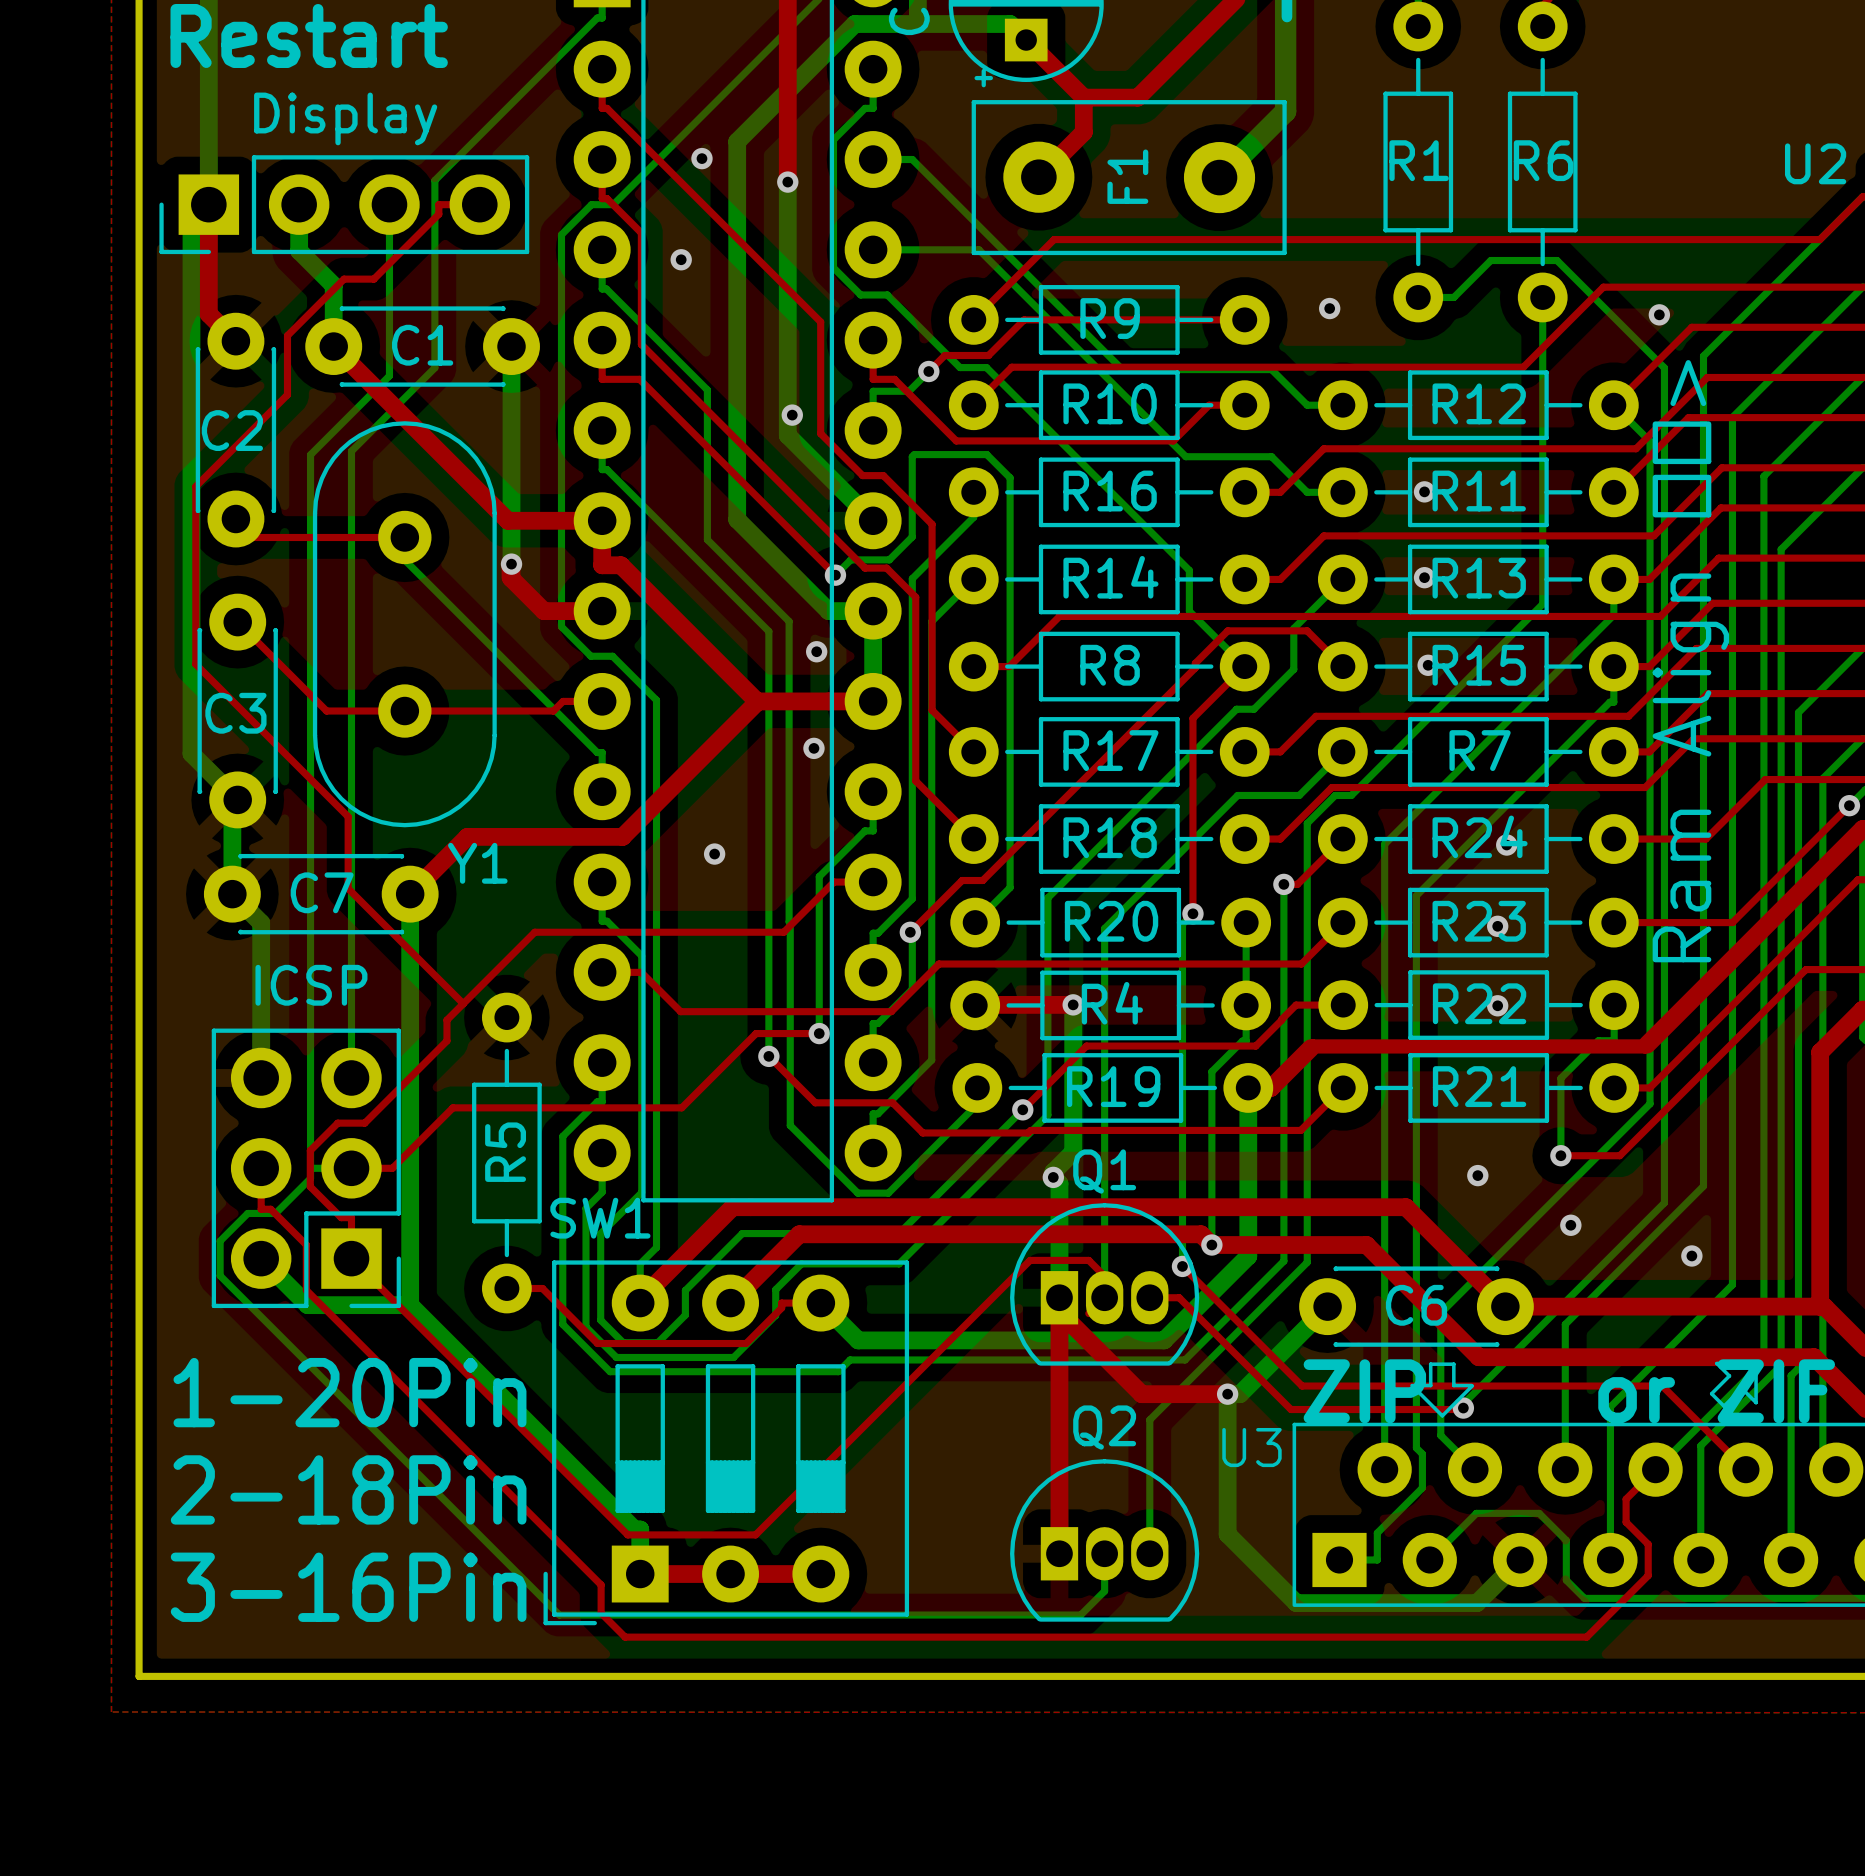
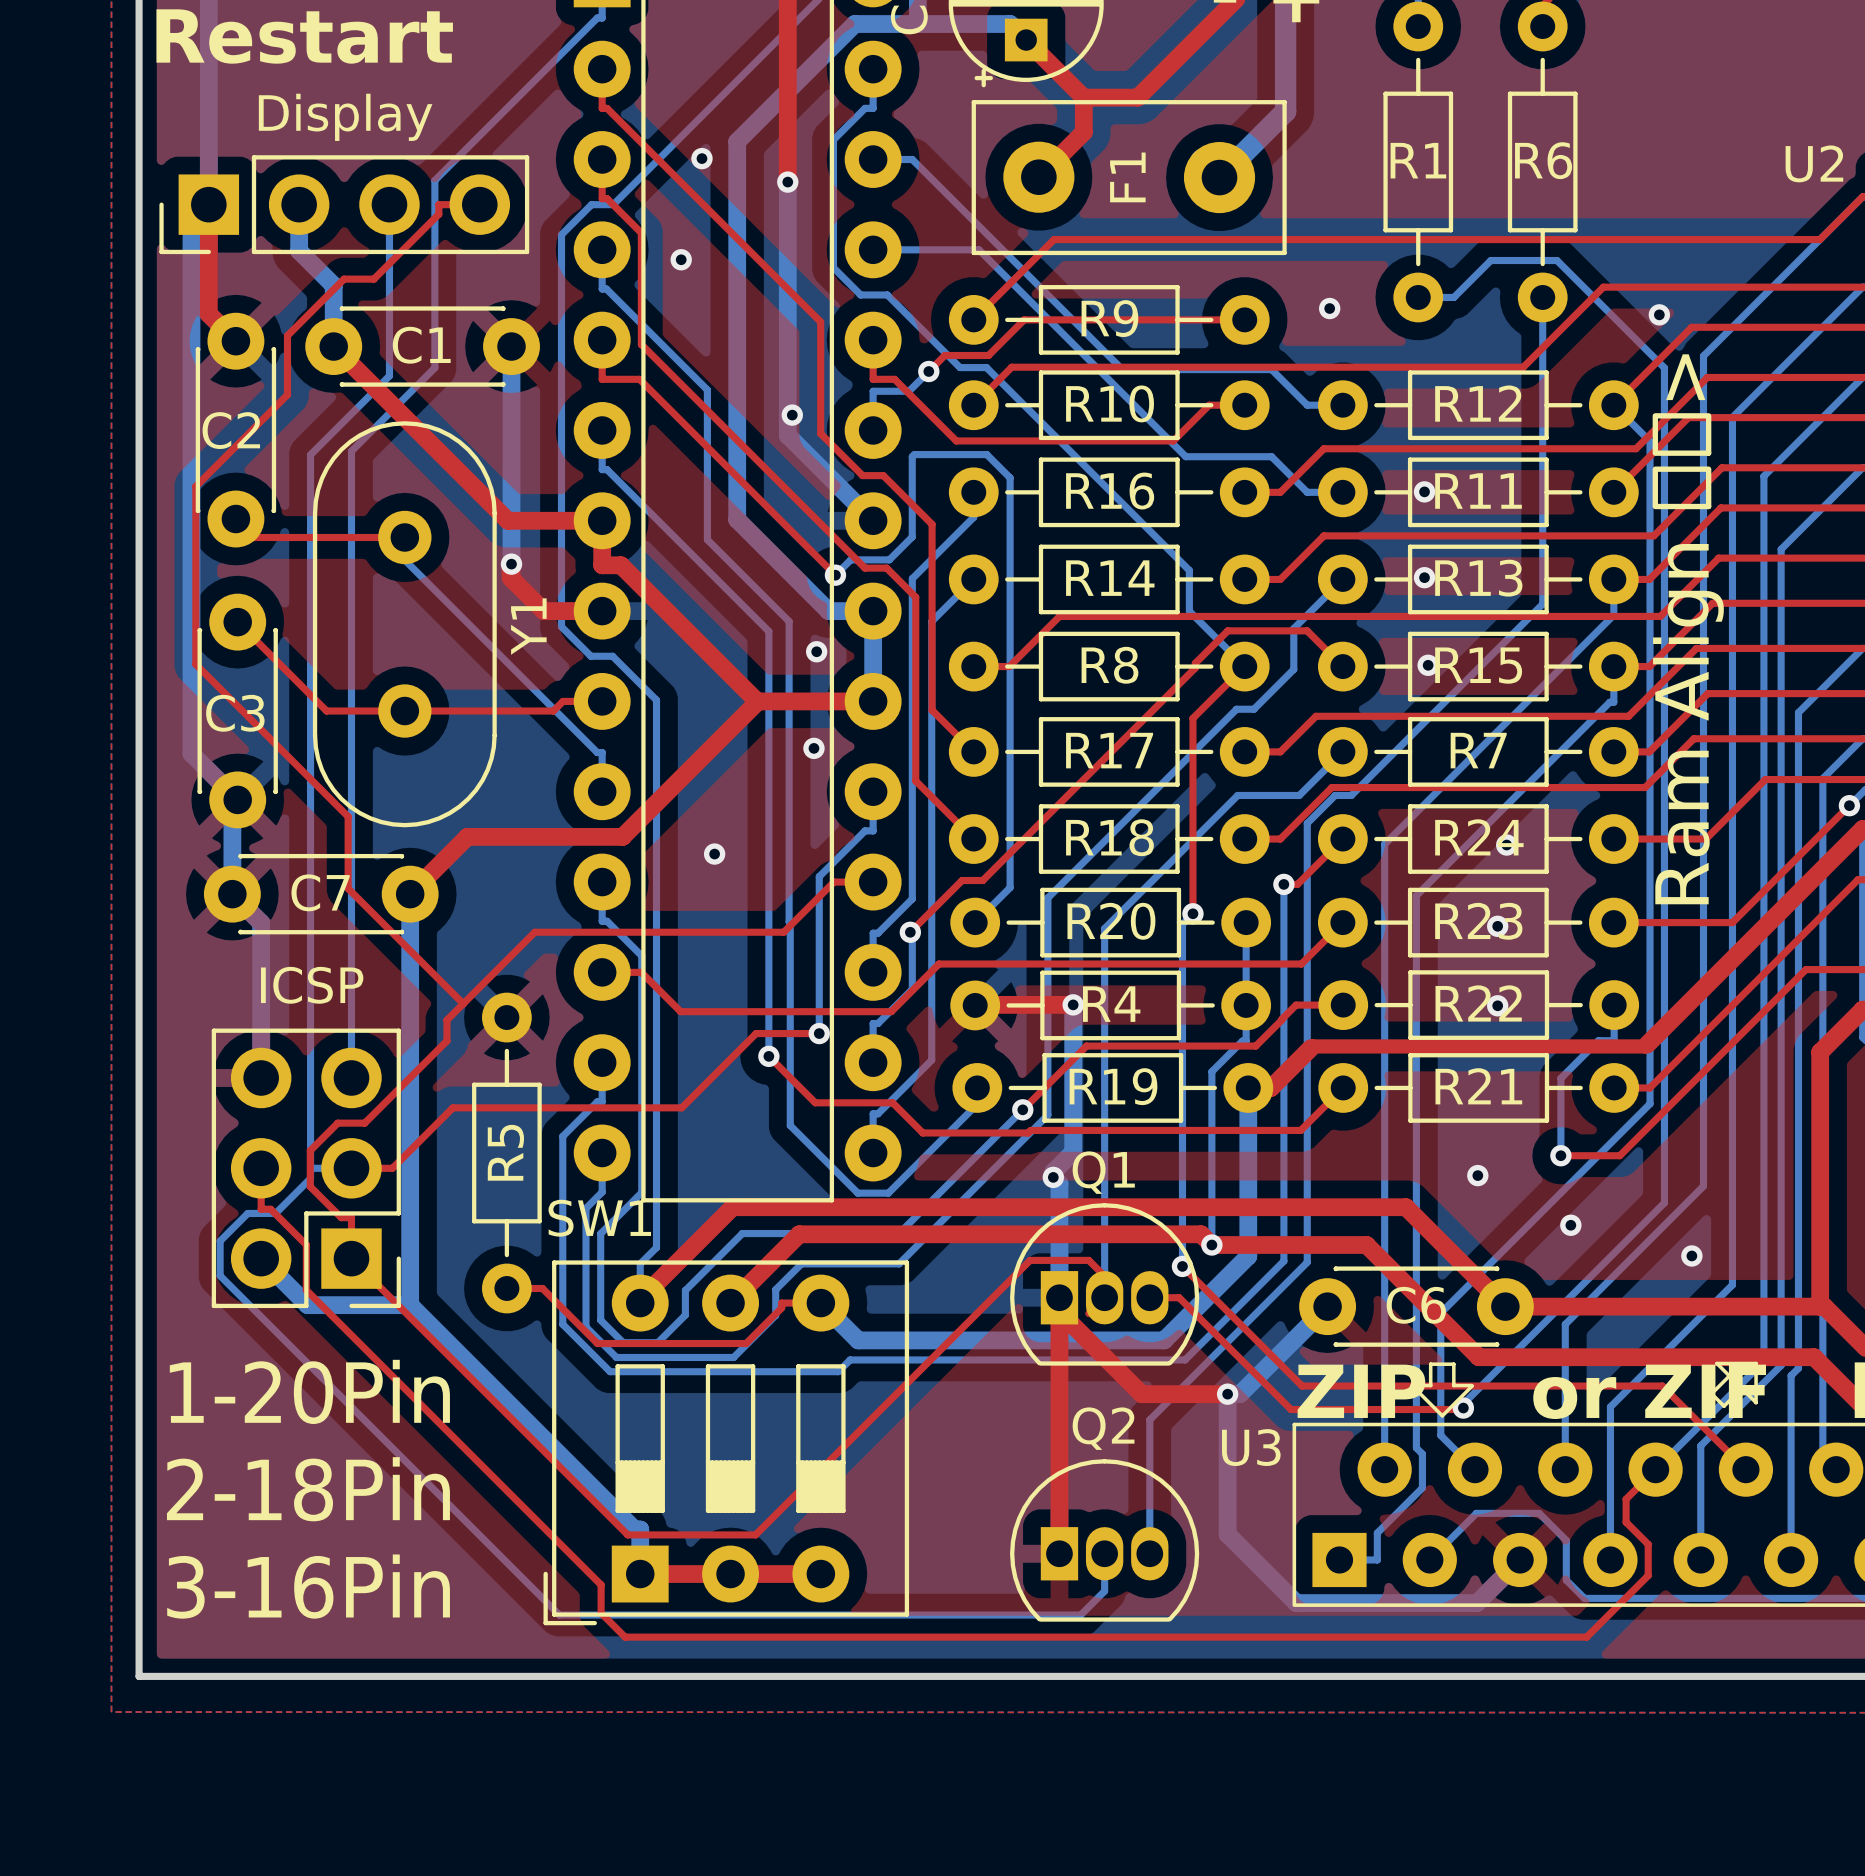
Y1 name rotation: 0° (477, 863) -> 90° counterclockwise (528, 626)
Y1 name position: Y1 (477, 863) -> Y1 (528, 626)

